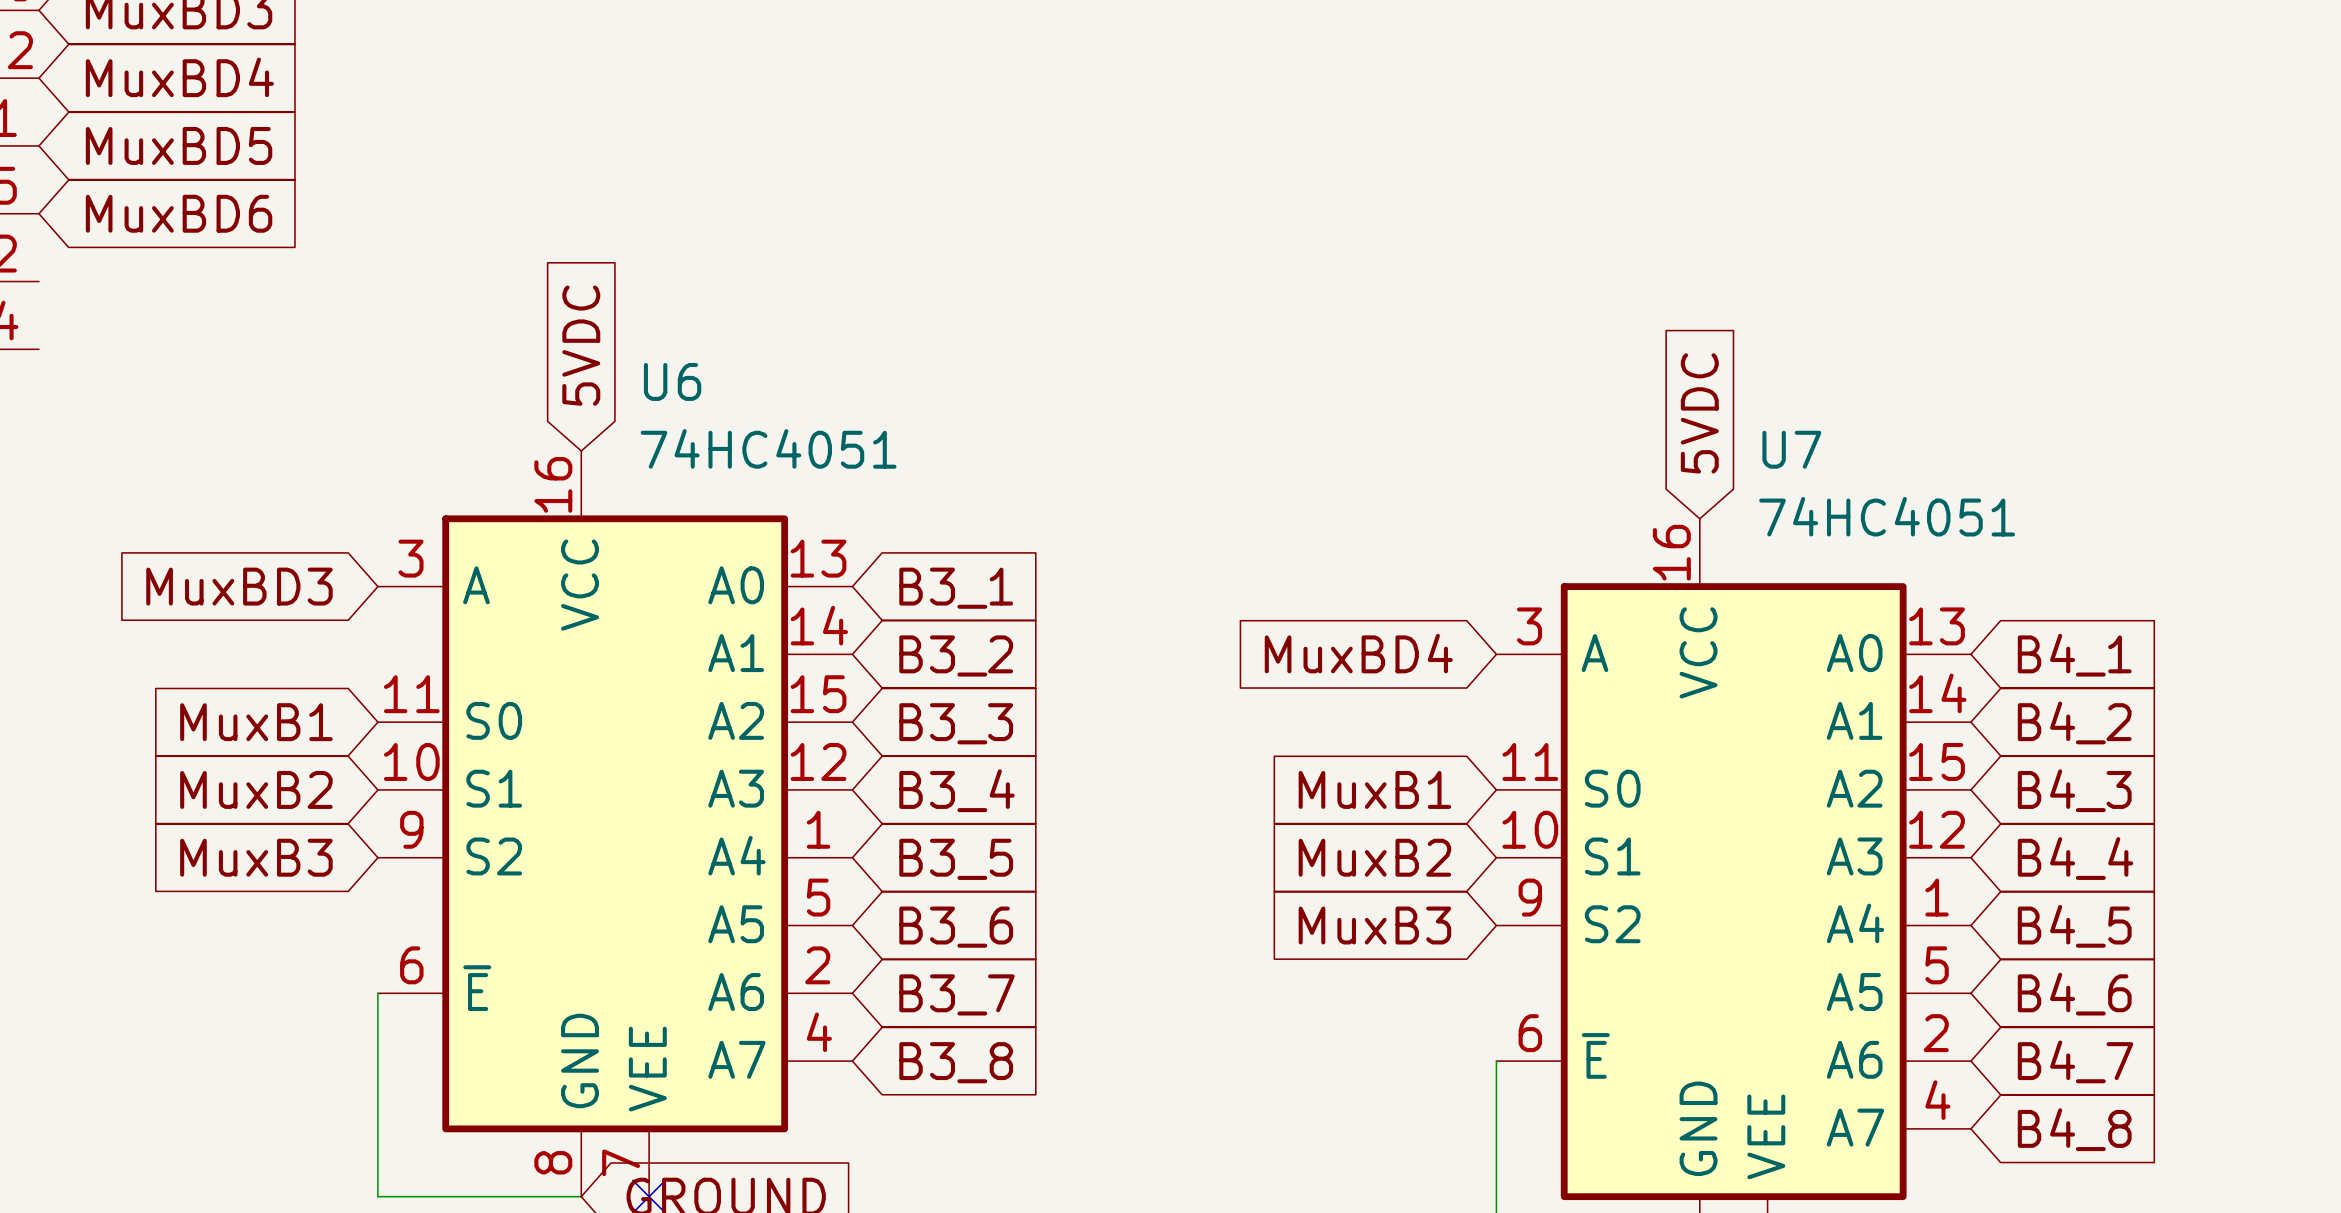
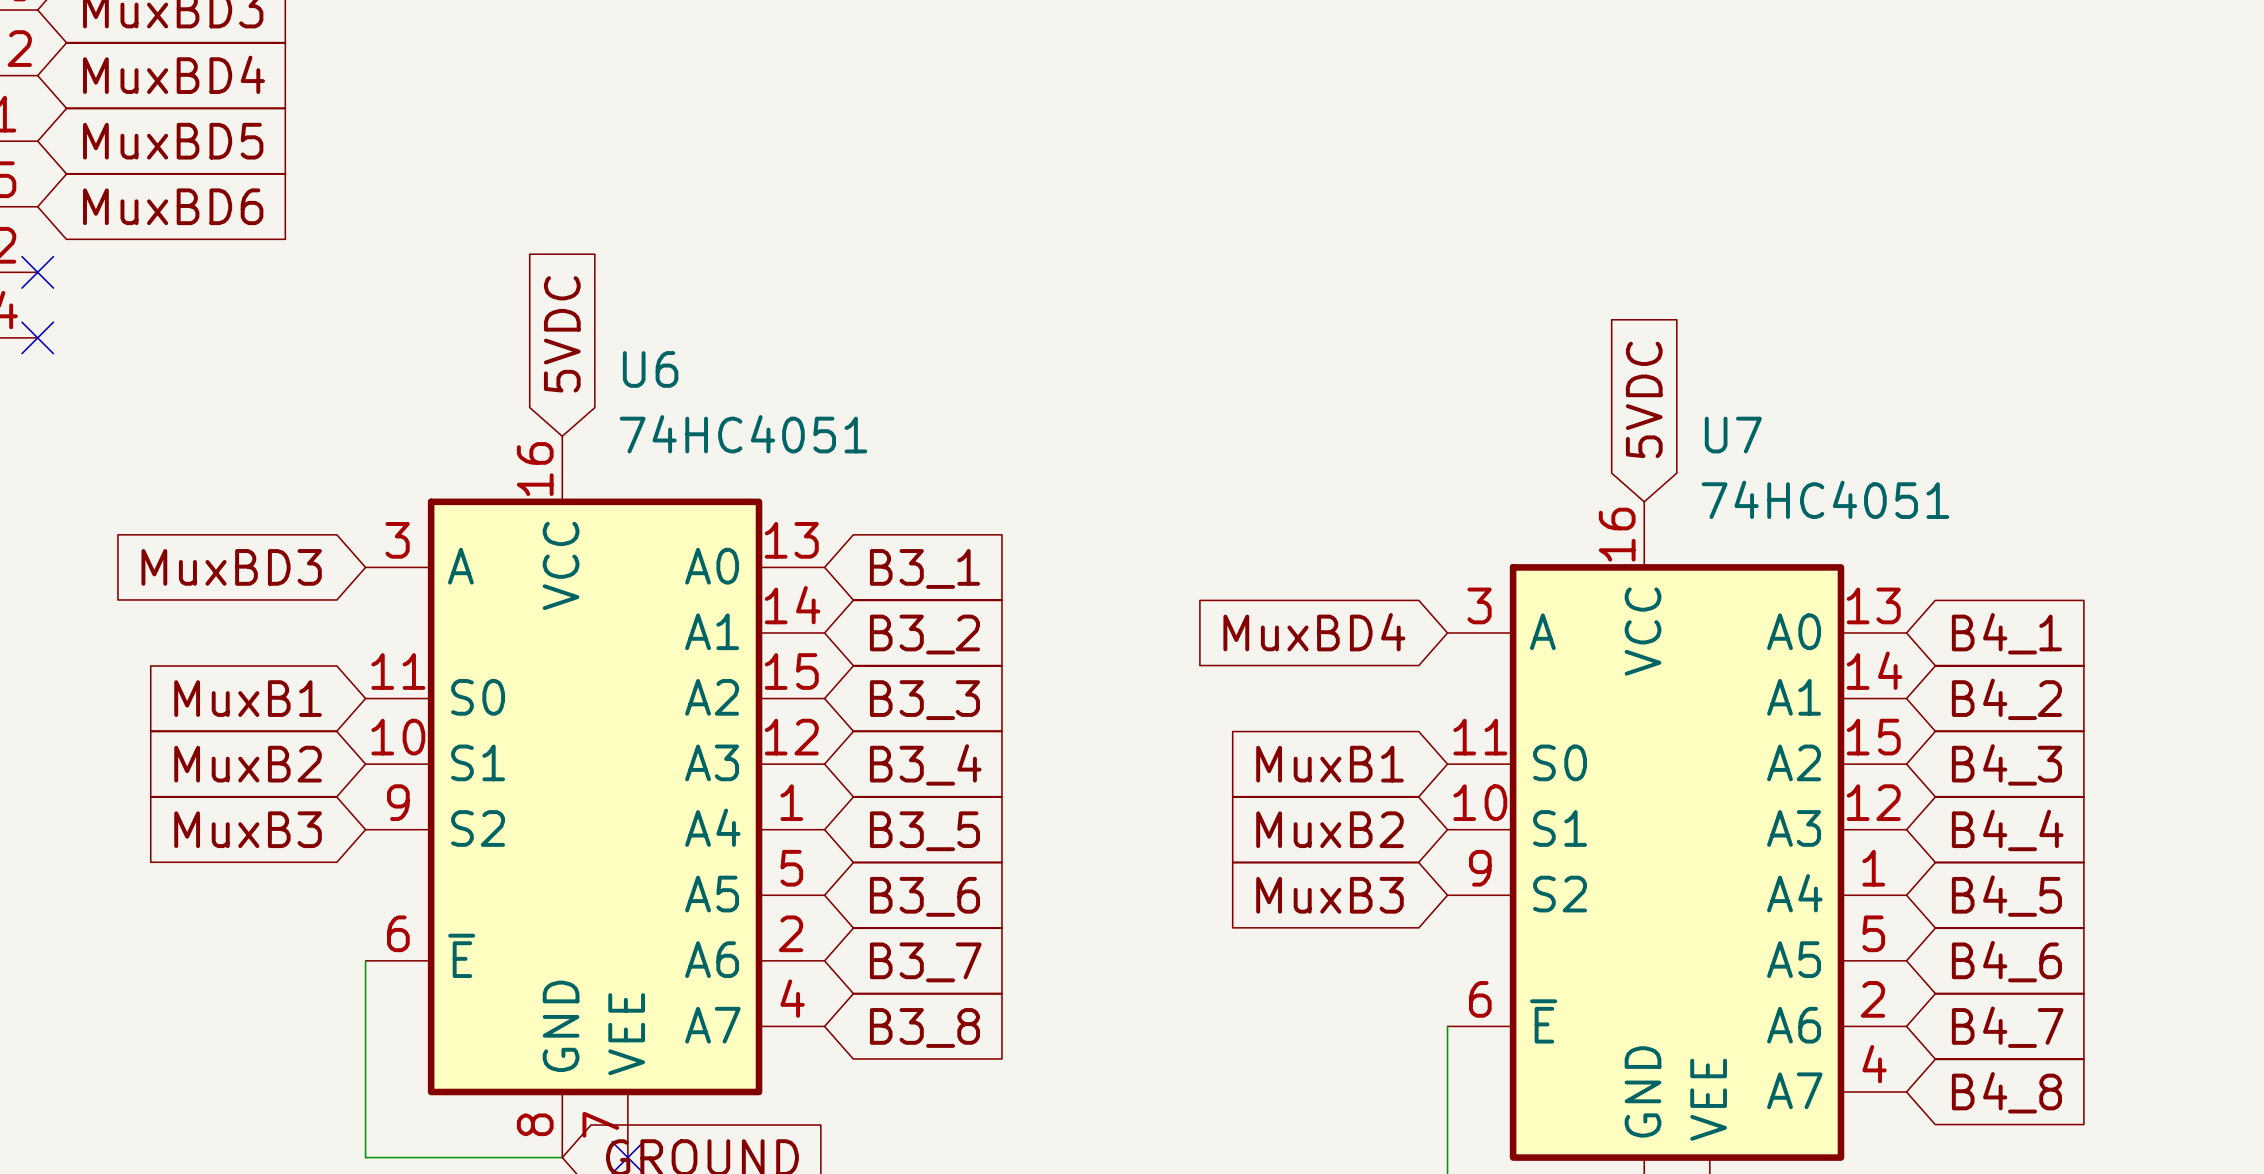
no-connect mark: none -> (37, 272)
no-connect mark: none -> (37, 337)

